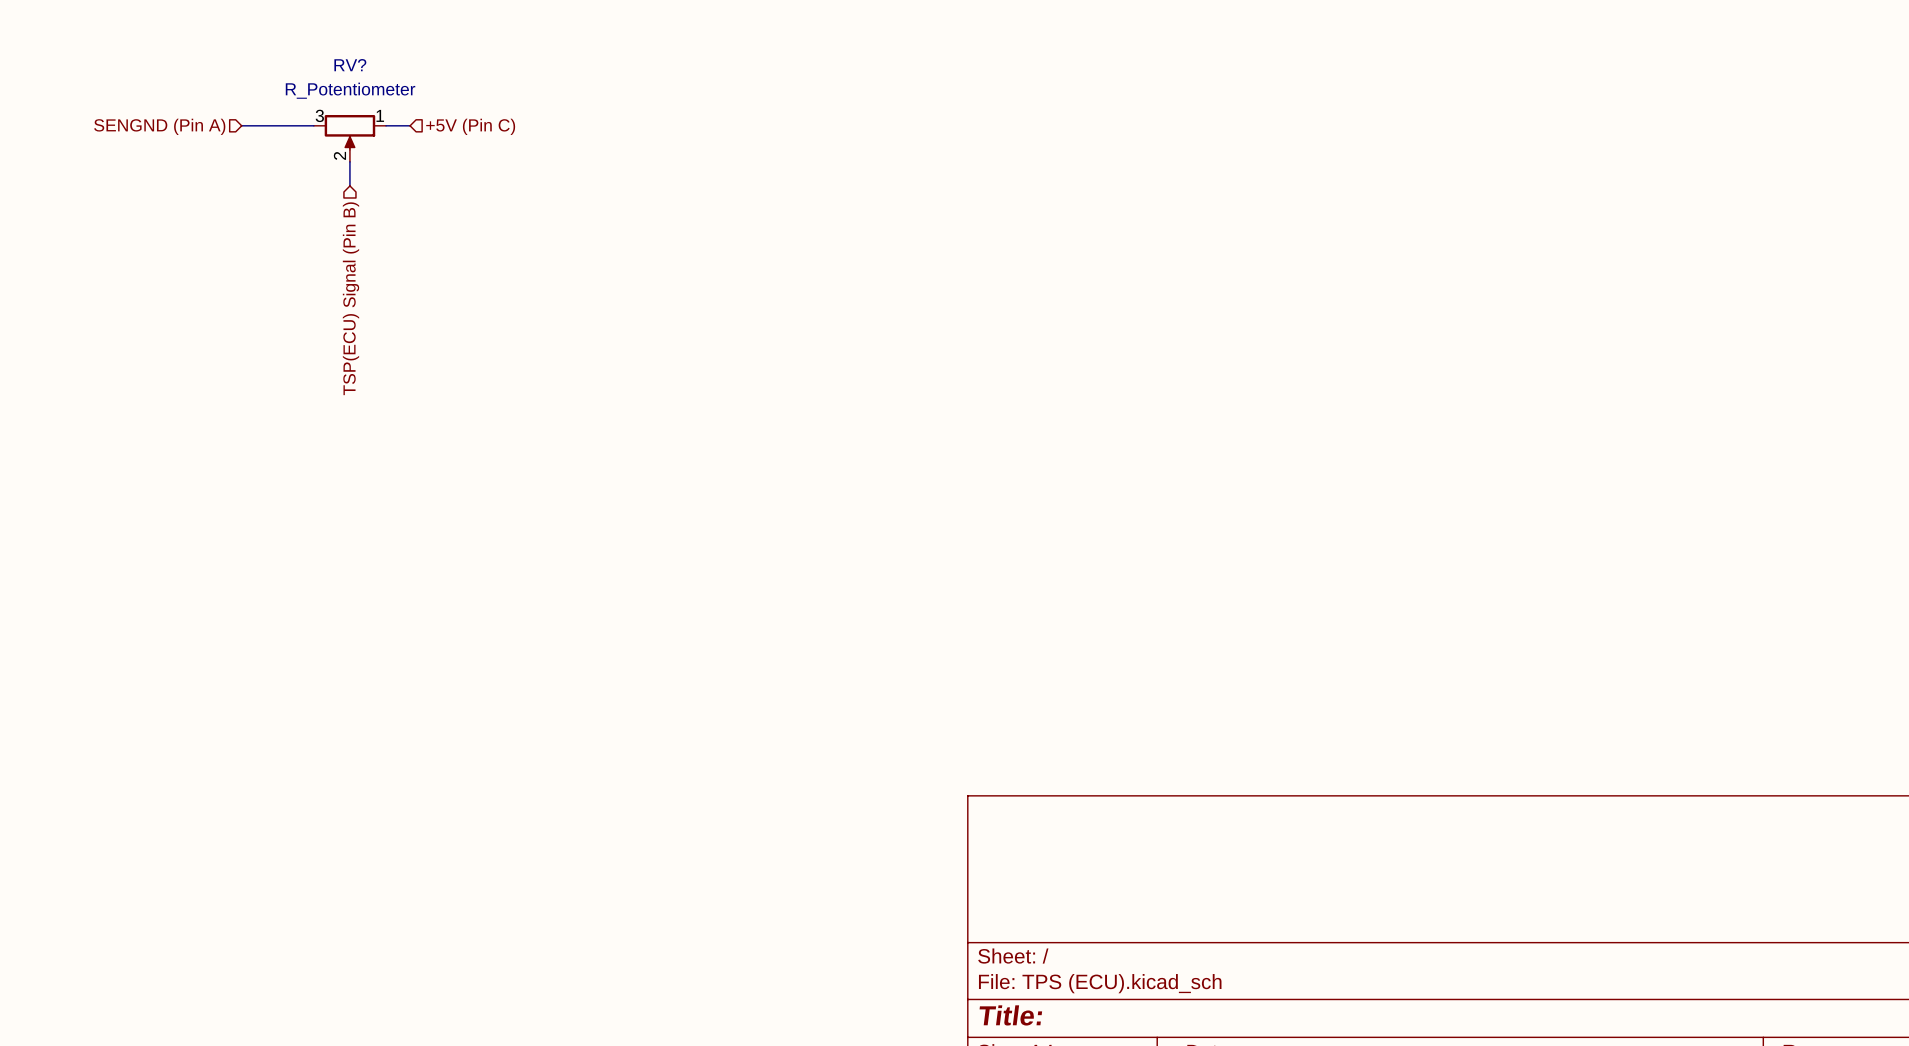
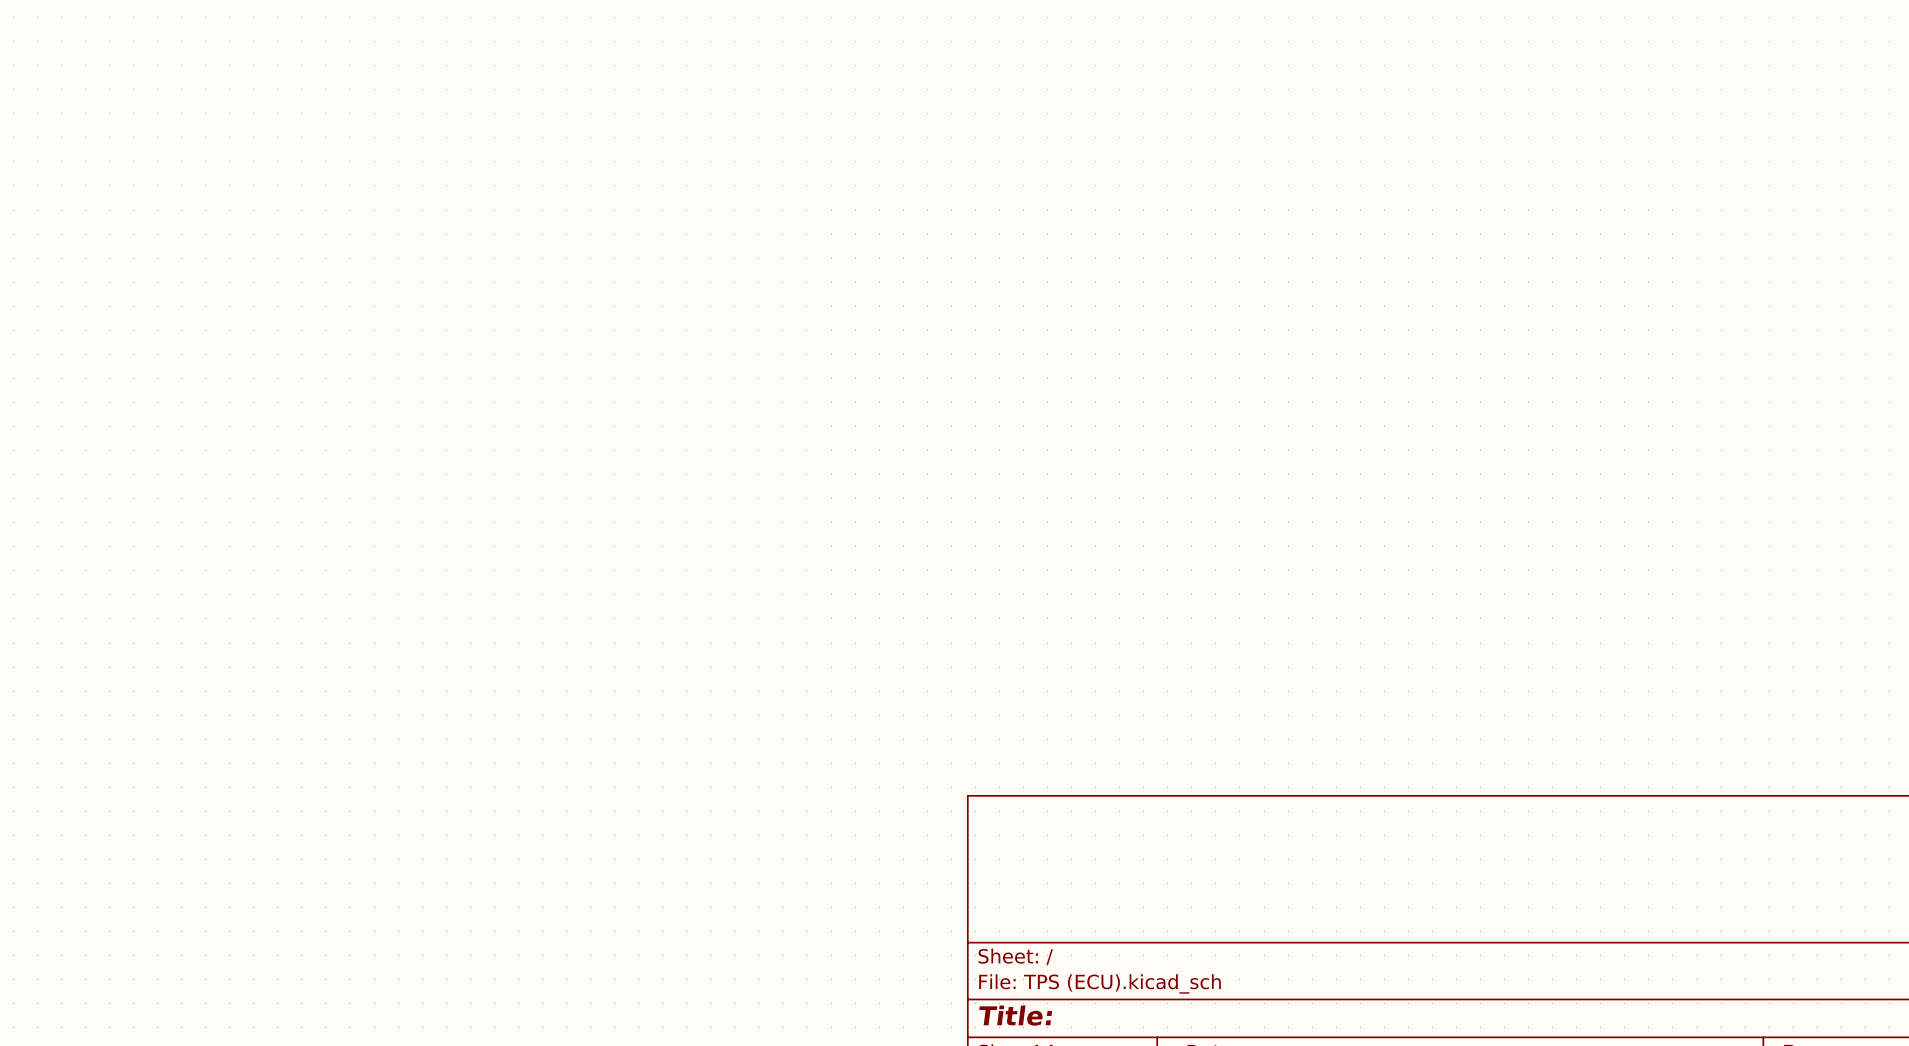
wire: (241, 125) (313, 125) -> none
wire: (386, 125) (410, 125) -> none
hierarchical label: SENGND (Pin A) (159, 126) -> none
hierarchical label: +5V (Pin C) (470, 126) -> none
RV?: R_Potentiometer (349, 138) -> none
wire: (349, 161) (349, 185) -> none
hierarchical label: TSP(ECU) Signal (Pin B) (350, 298) -> none

